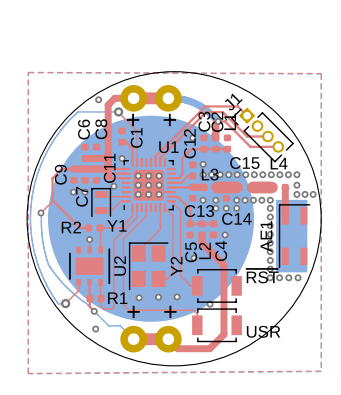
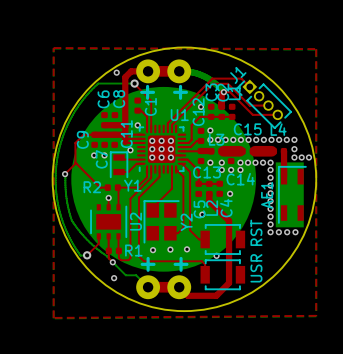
part value: ~{RST} (262, 276) -> RST (256, 232)
part value rotation: 0° (263, 331) -> 90° counterclockwise (256, 268)

